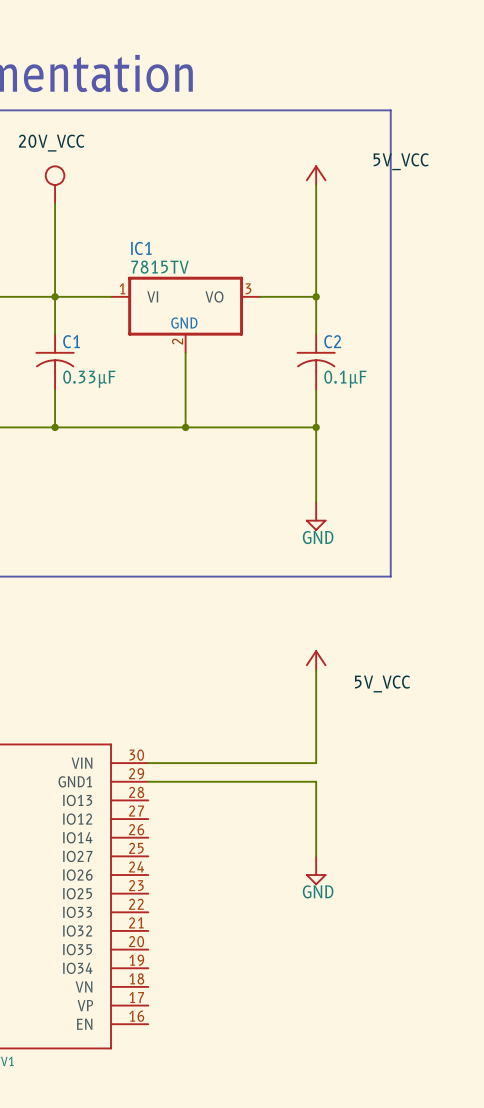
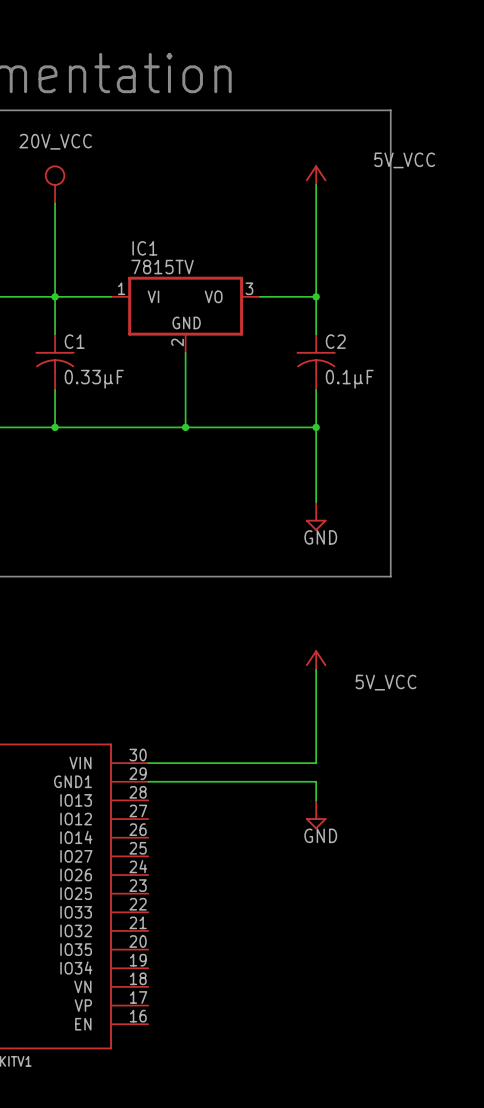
wire: (316, 800) (316, 856) -> none
power symbol position: GND (316, 870) -> GND (316, 814)

